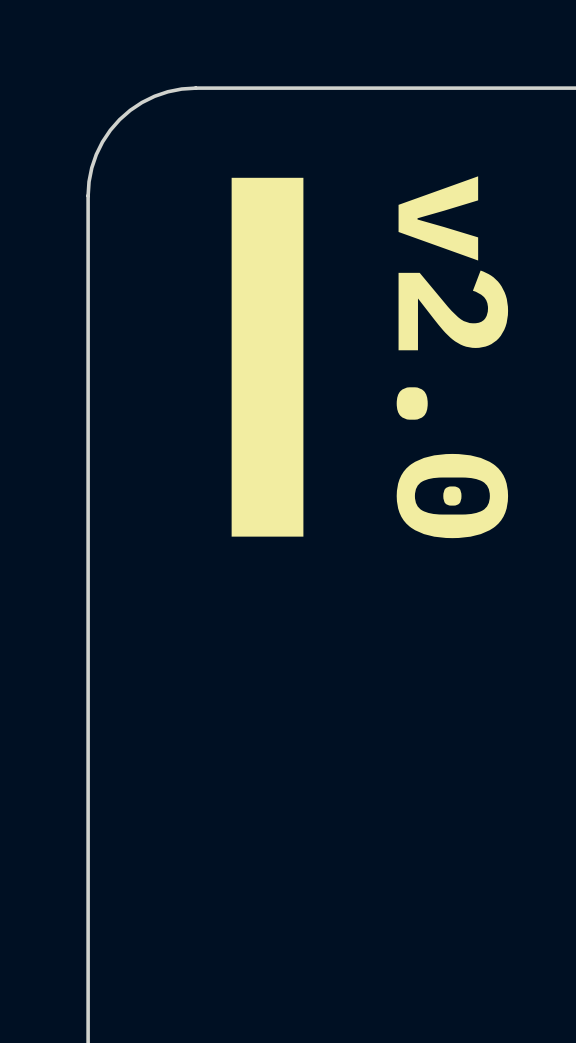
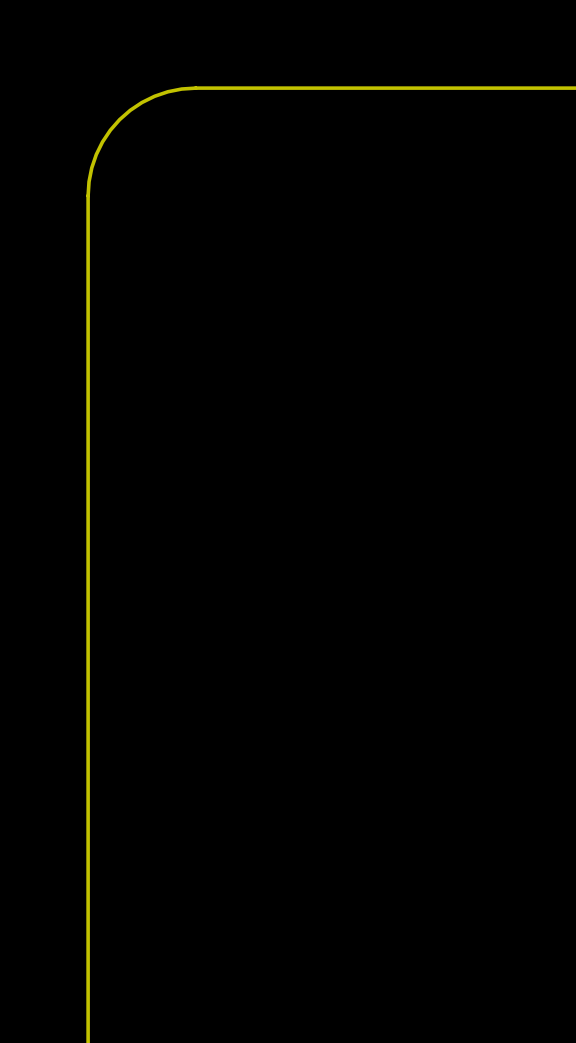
drawing: [231, 177, 304, 537] -> none
text: v2.0 (452, 357) -> none

